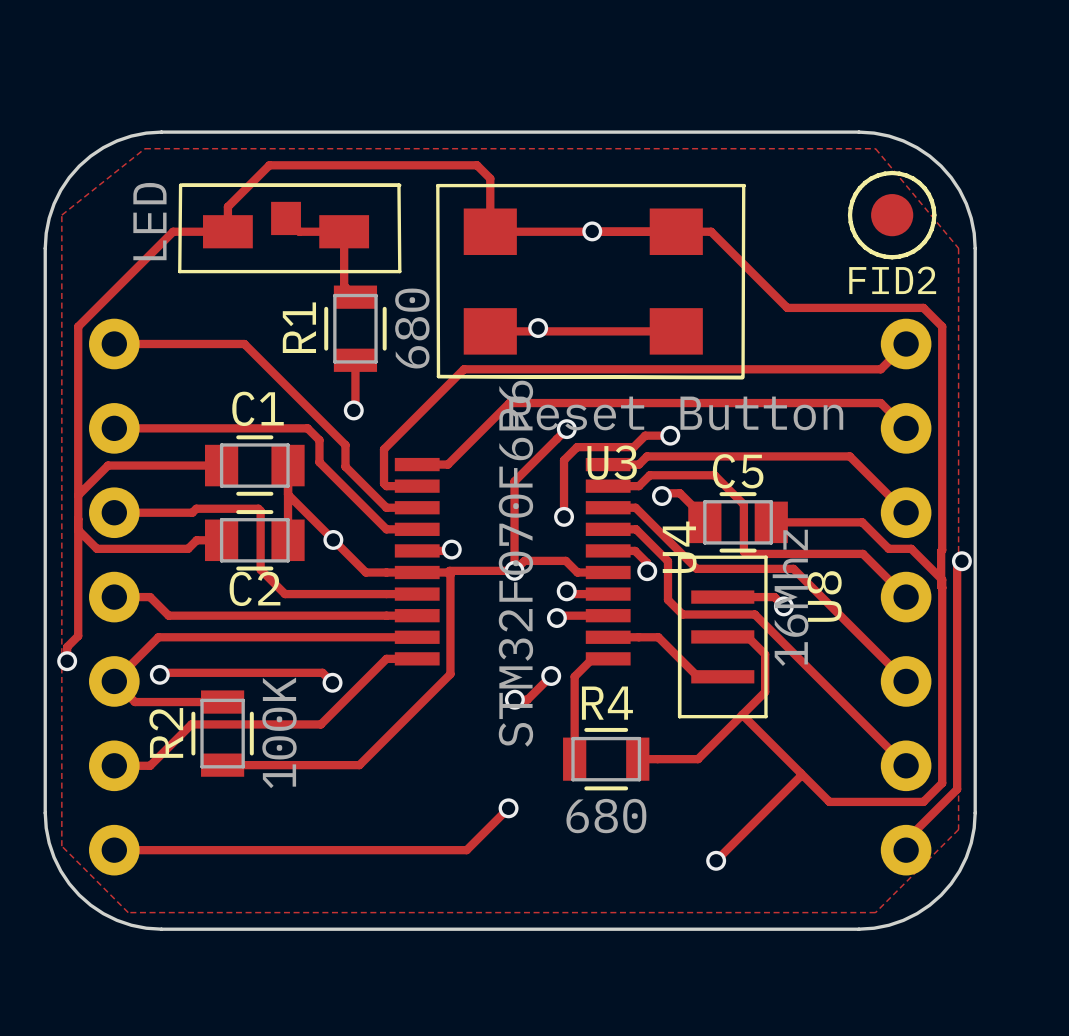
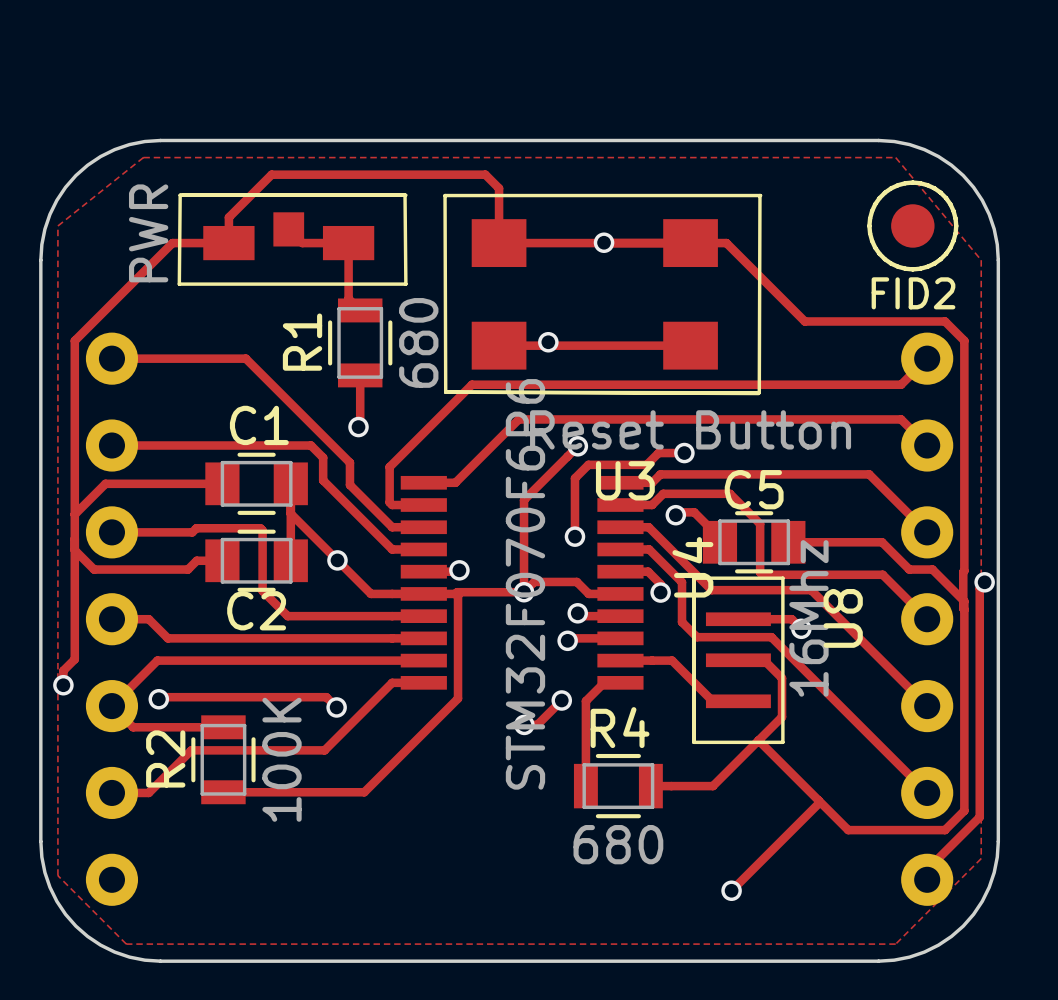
part value: LED (149, 221) -> PWR (148, 233)
track: (508, 808) (466, 850) (114, 850) -> none
via: (508, 808) -> none

